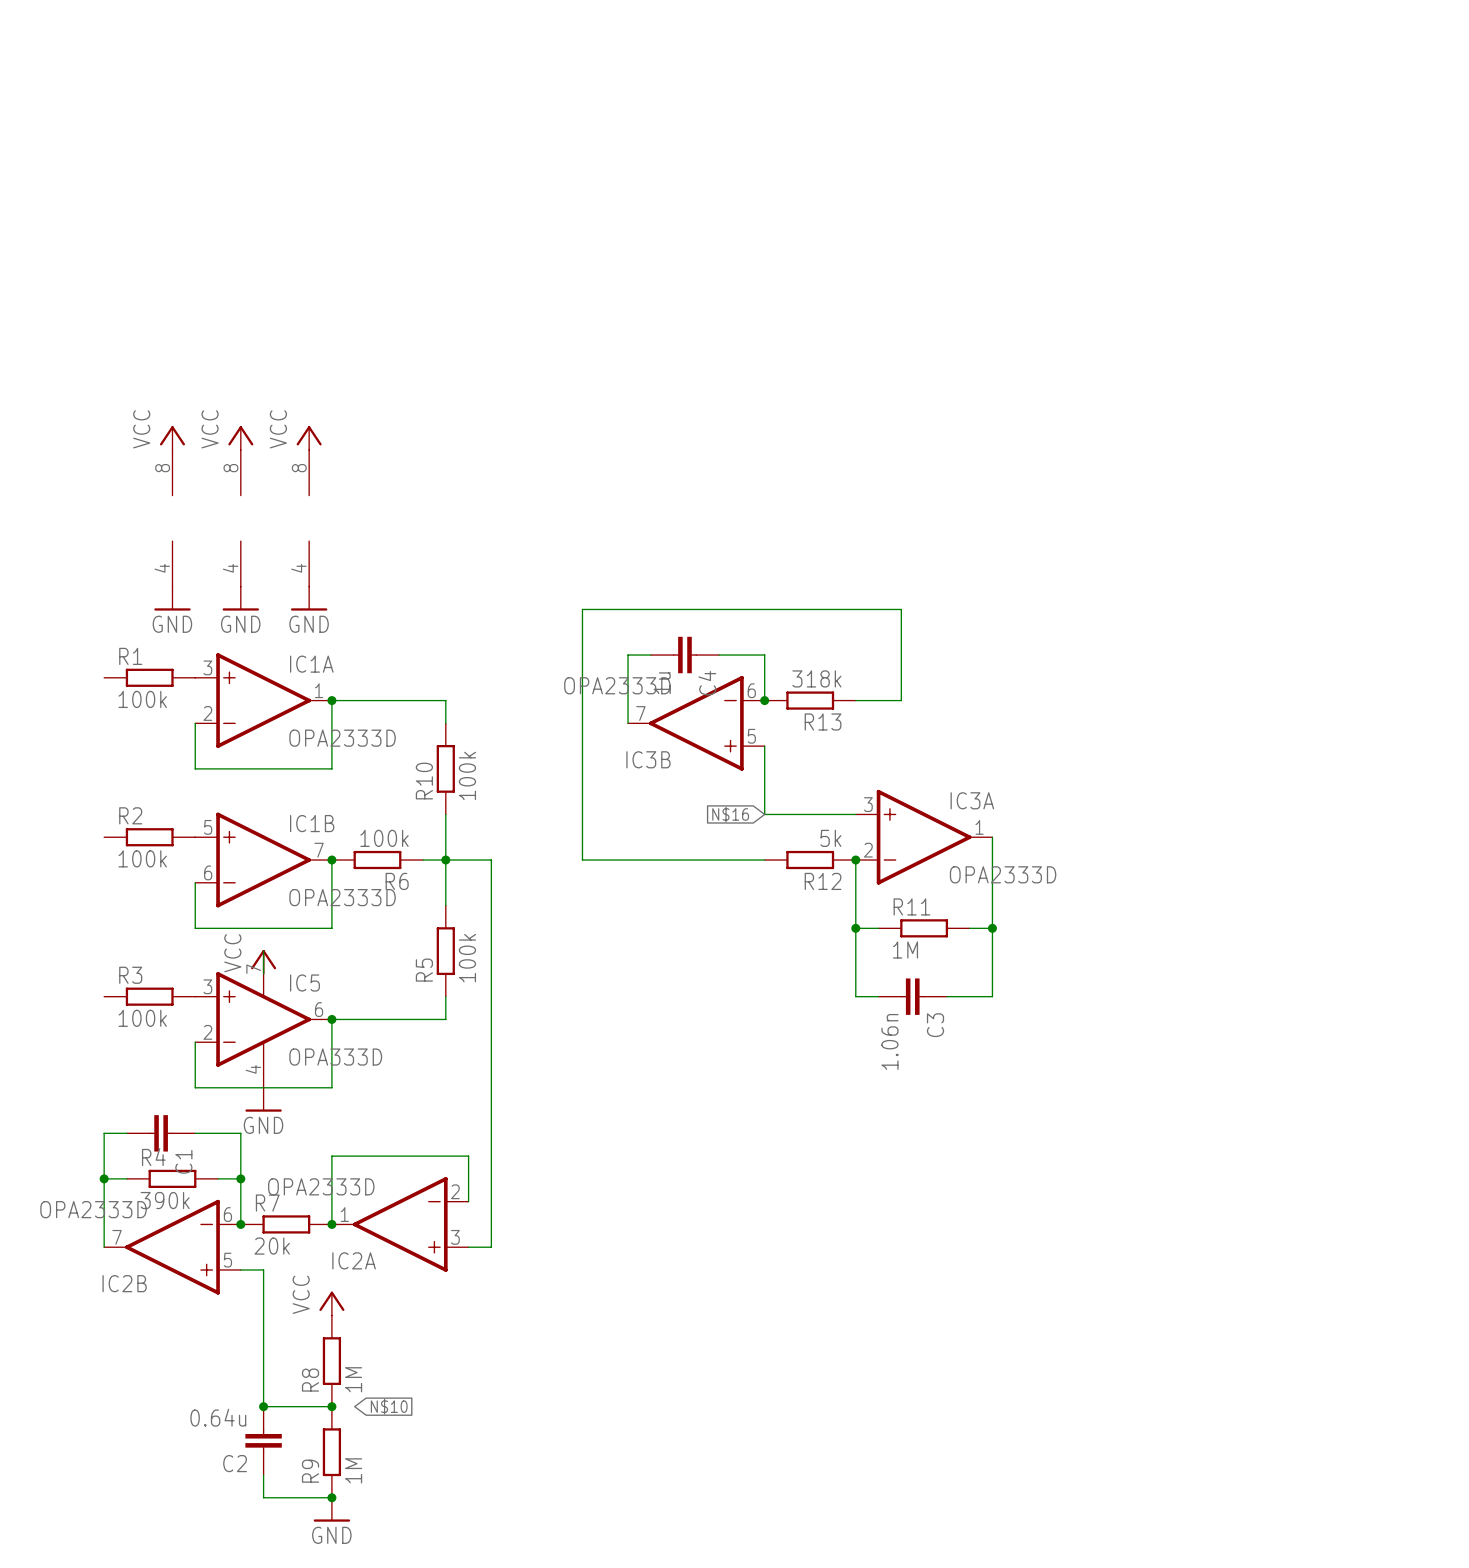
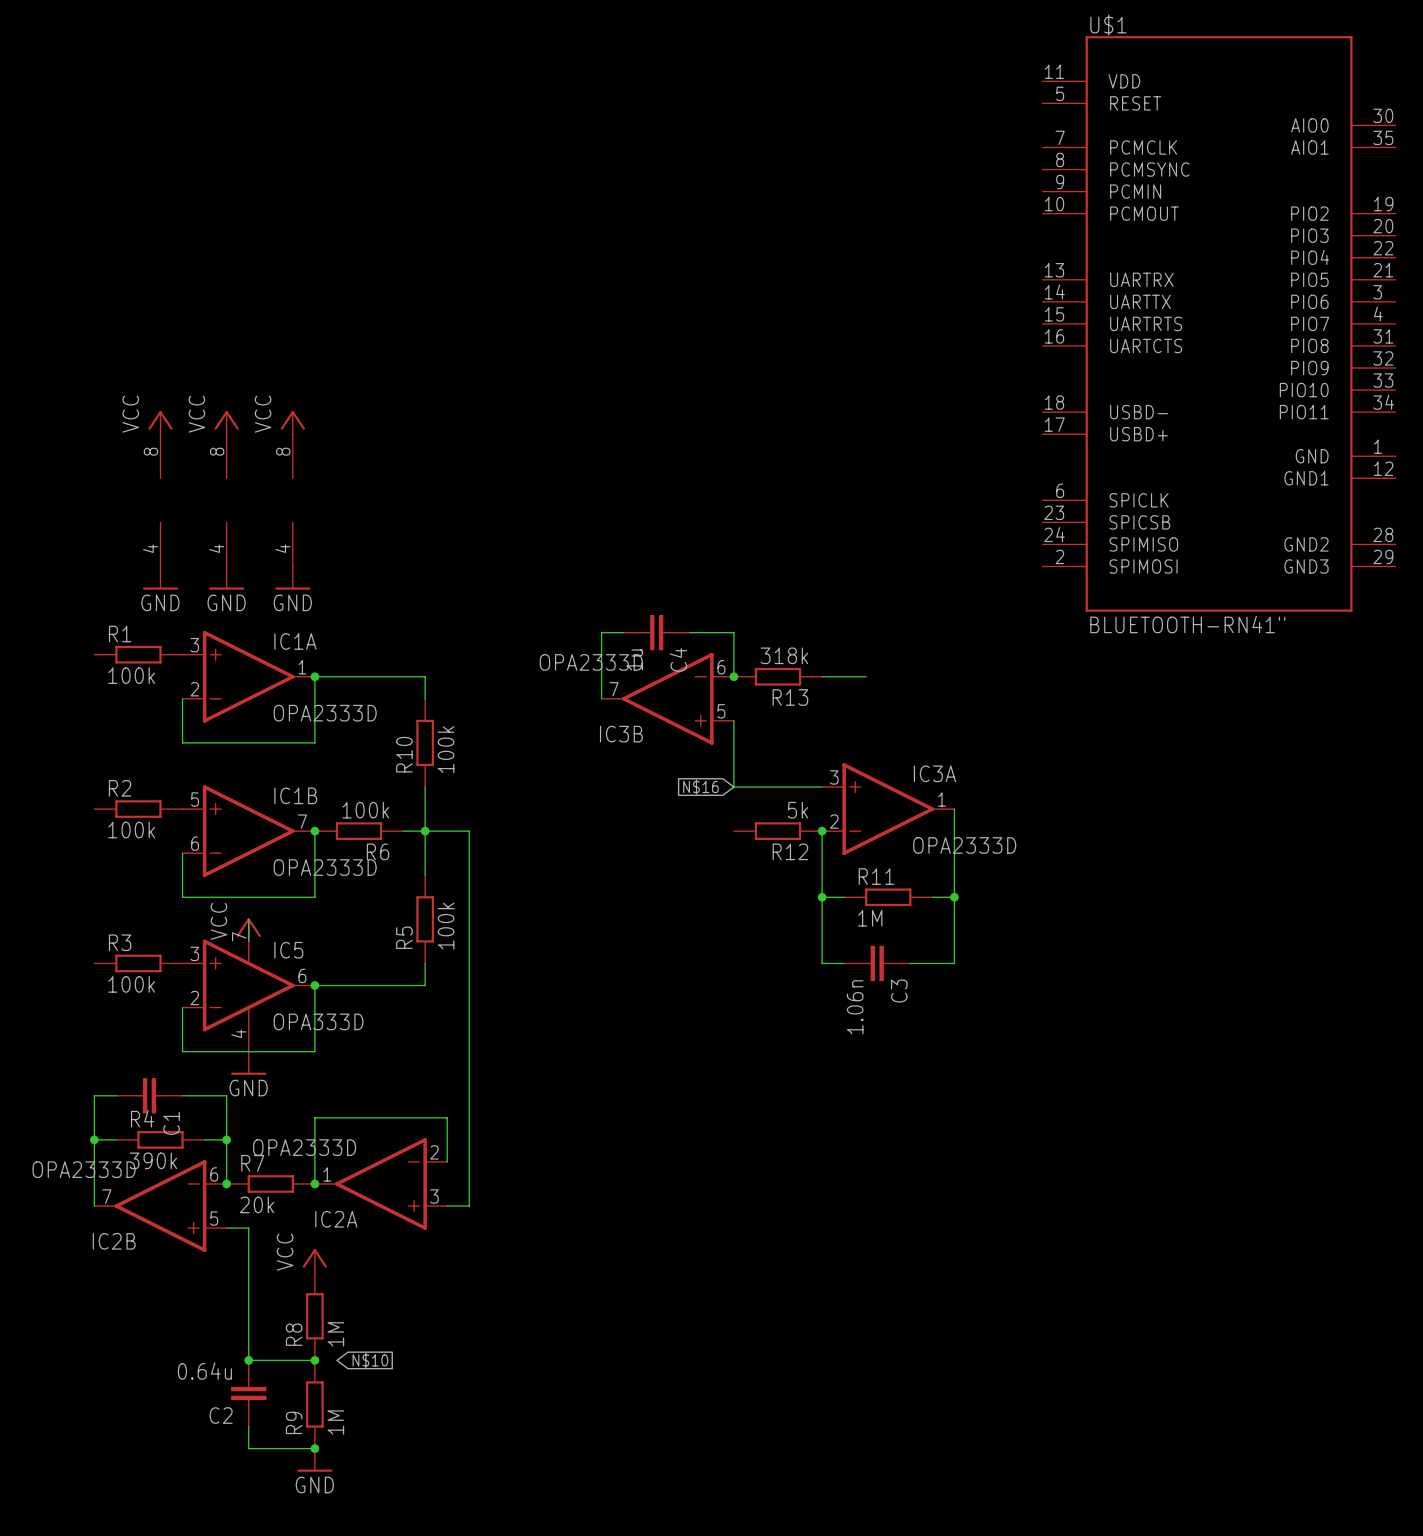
U$1: none -> BLUETOOTH-RN41" (1219, 323)
wire: (901, 700) (901, 609) (582, 609) (582, 860) (764, 860) -> none

